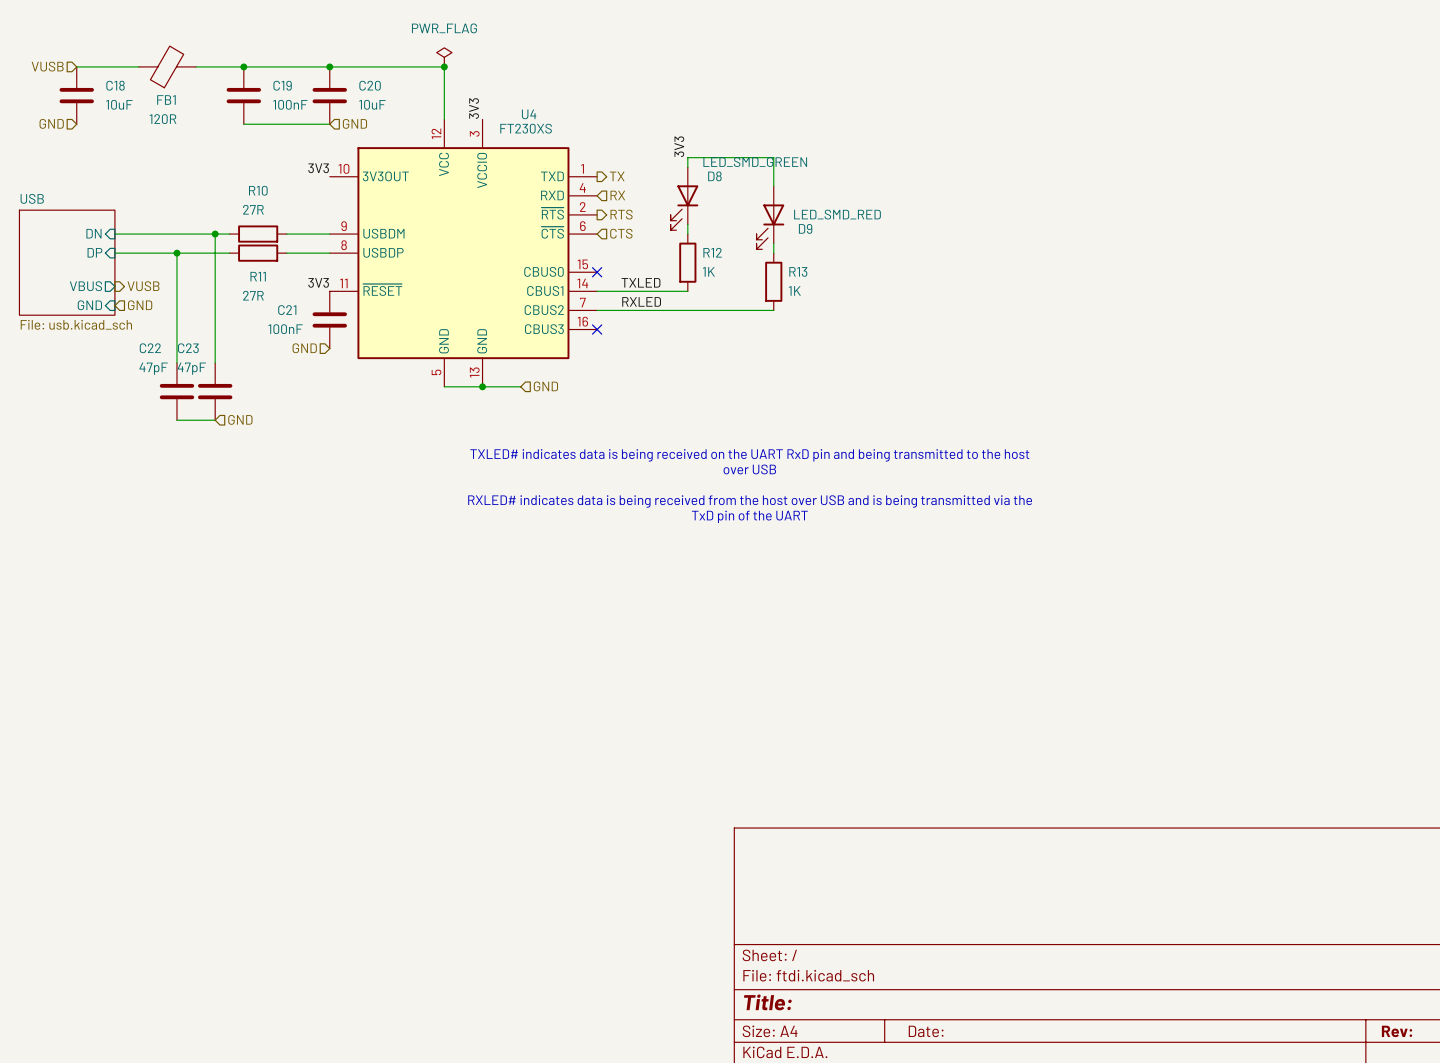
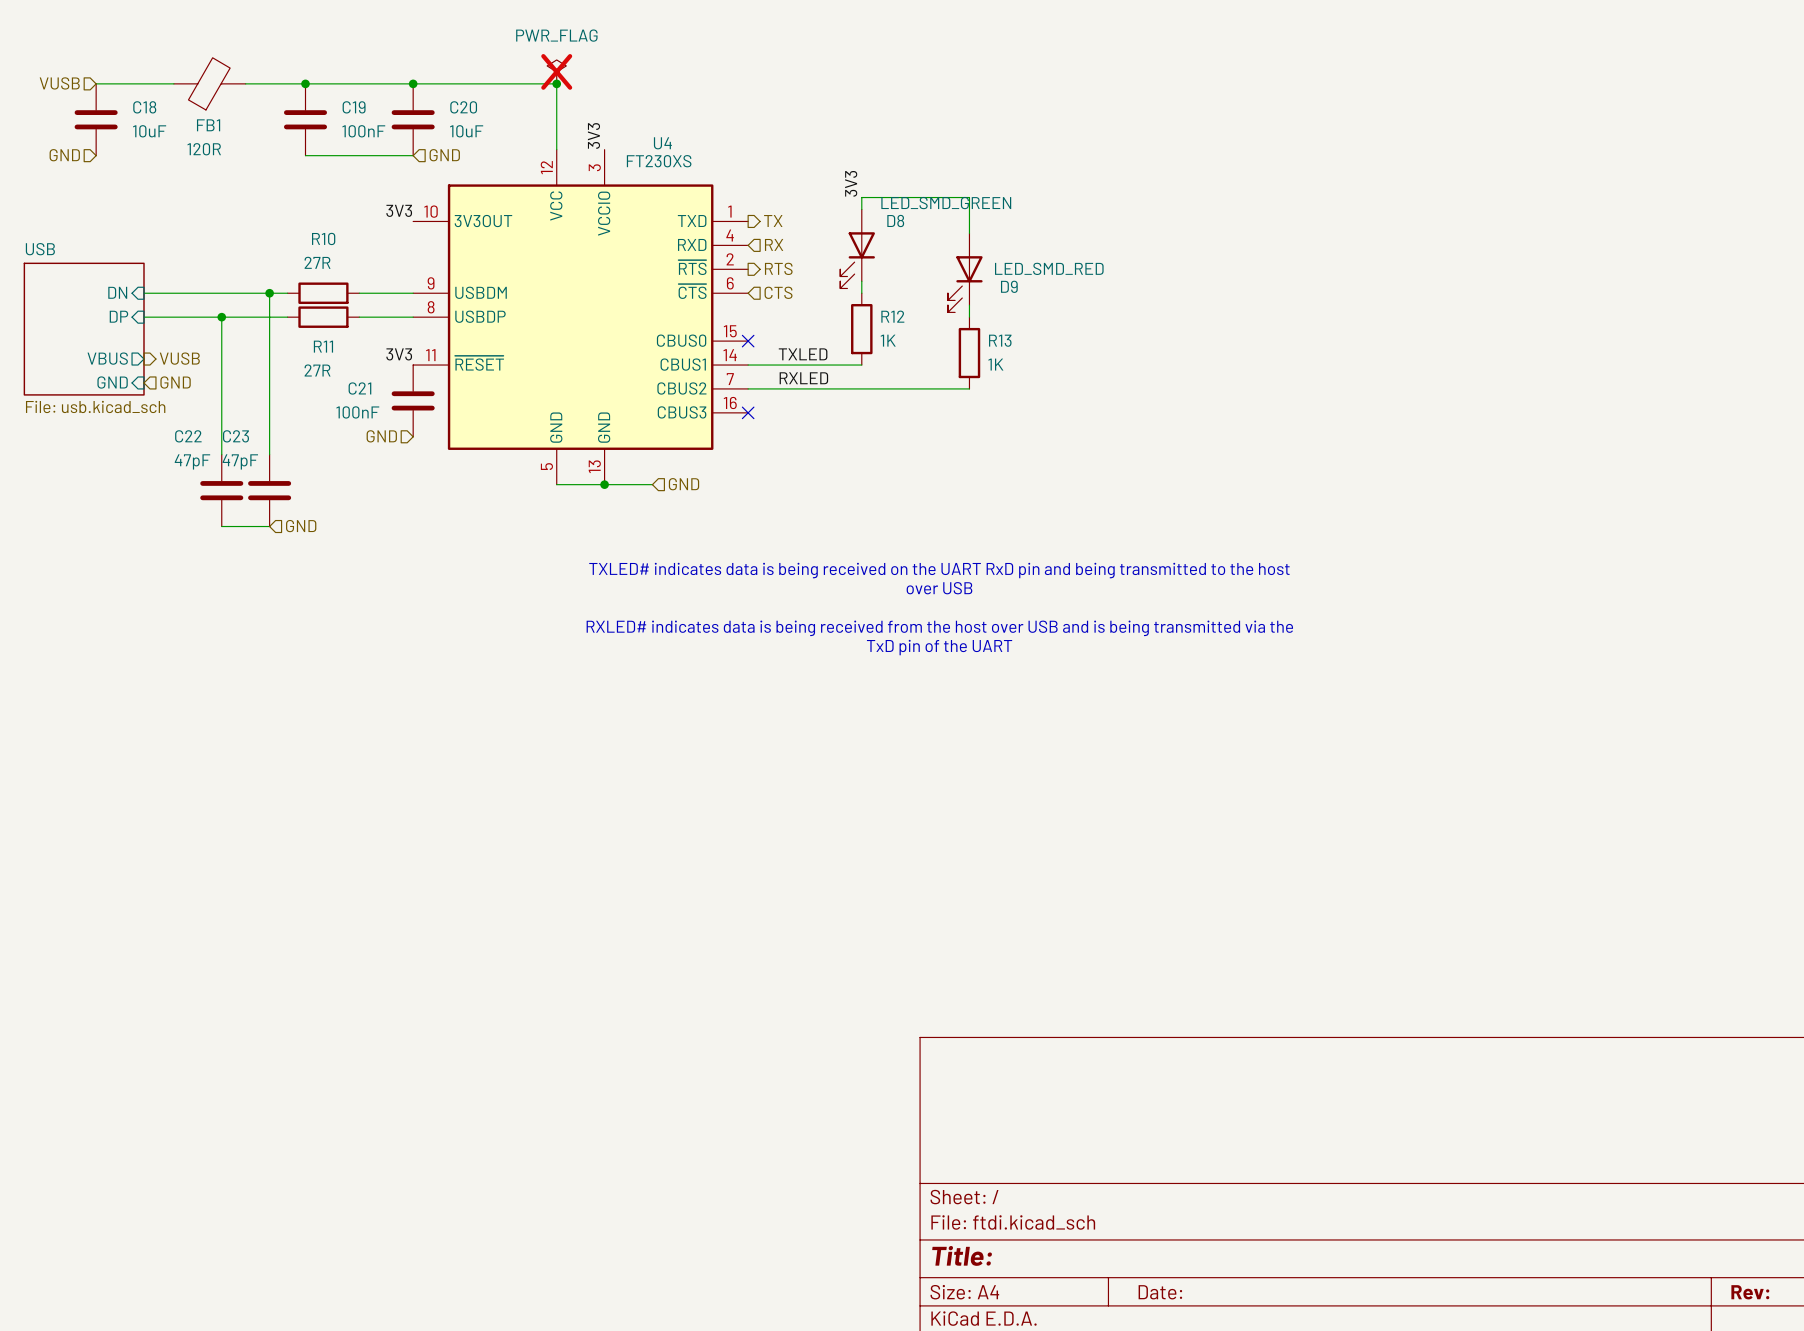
power symbol do-not-place cross: none -> (556, 71)

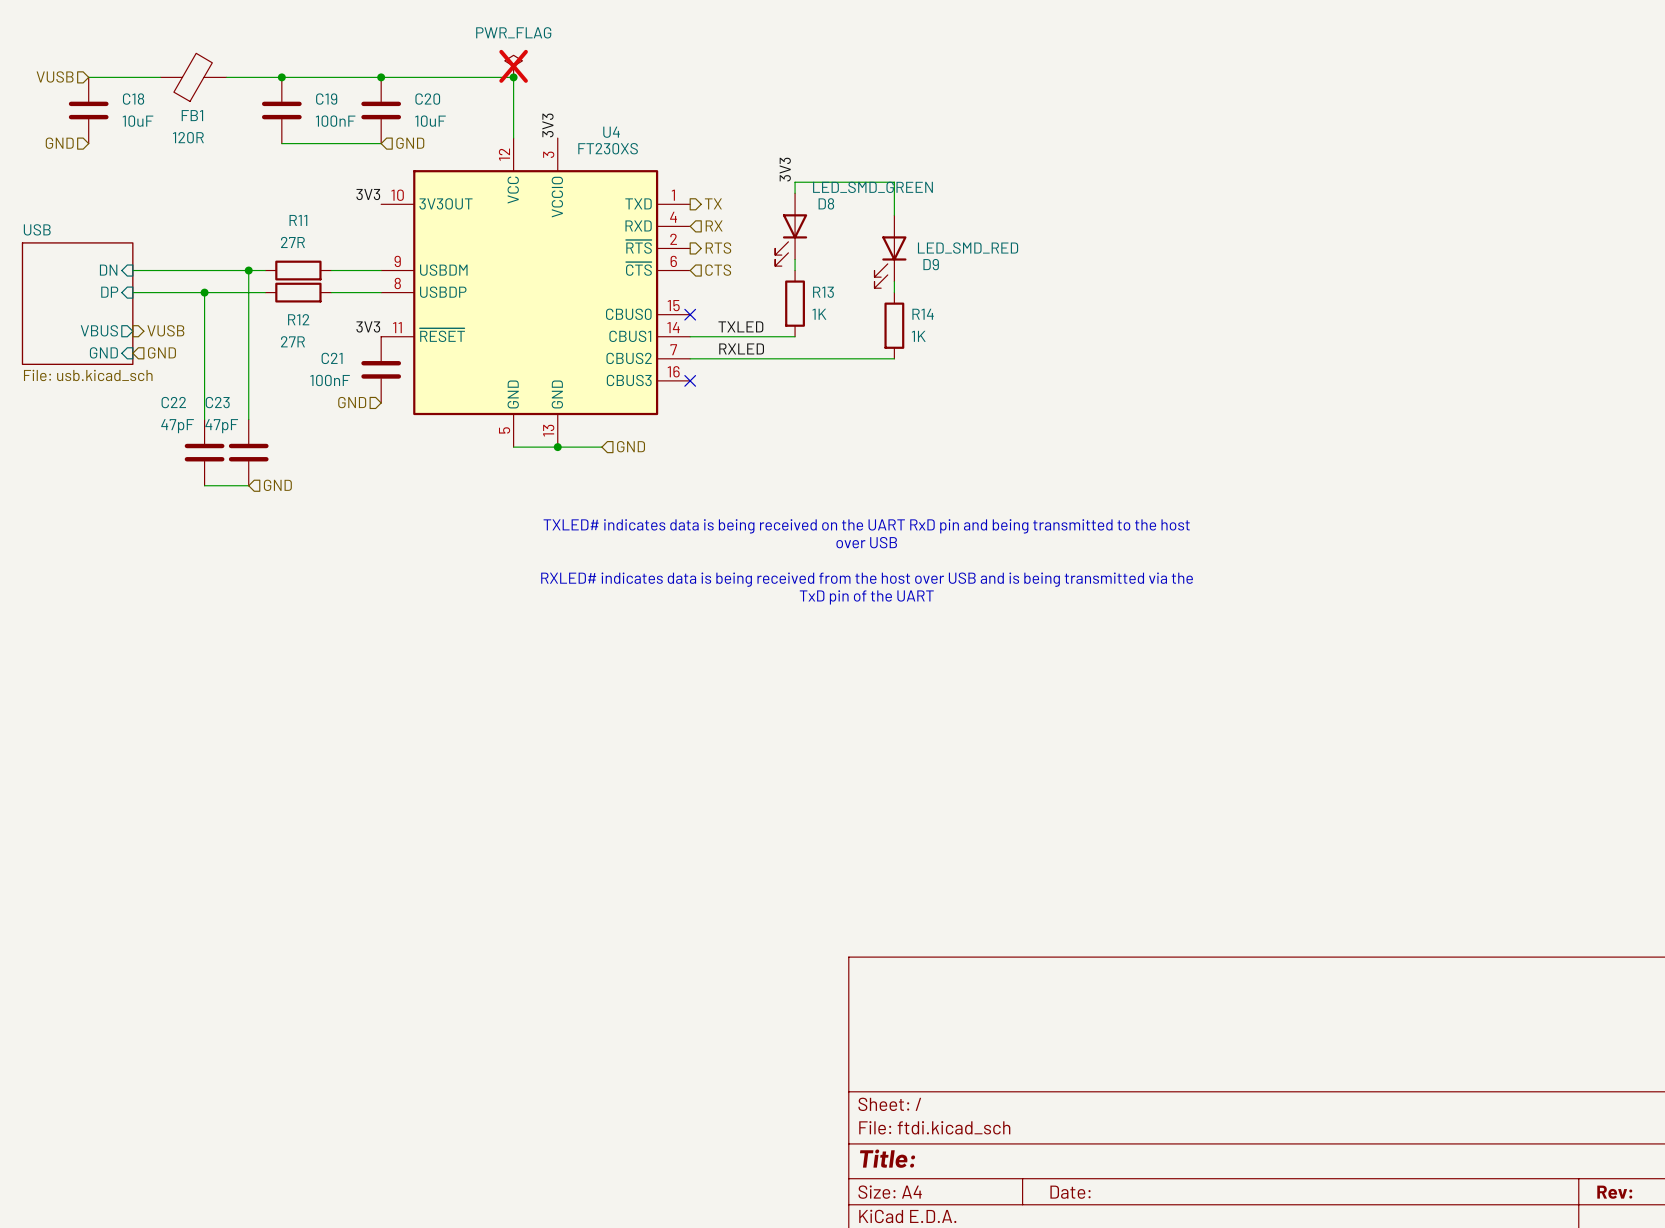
R10 name: R10 (323, 238) -> R11 (298, 220)
R12 name: R12 (892, 316) -> R13 (823, 292)
R13 name: R13 (1000, 340) -> R14 (923, 314)
R11 name: R11 (323, 346) -> R12 (298, 319)

